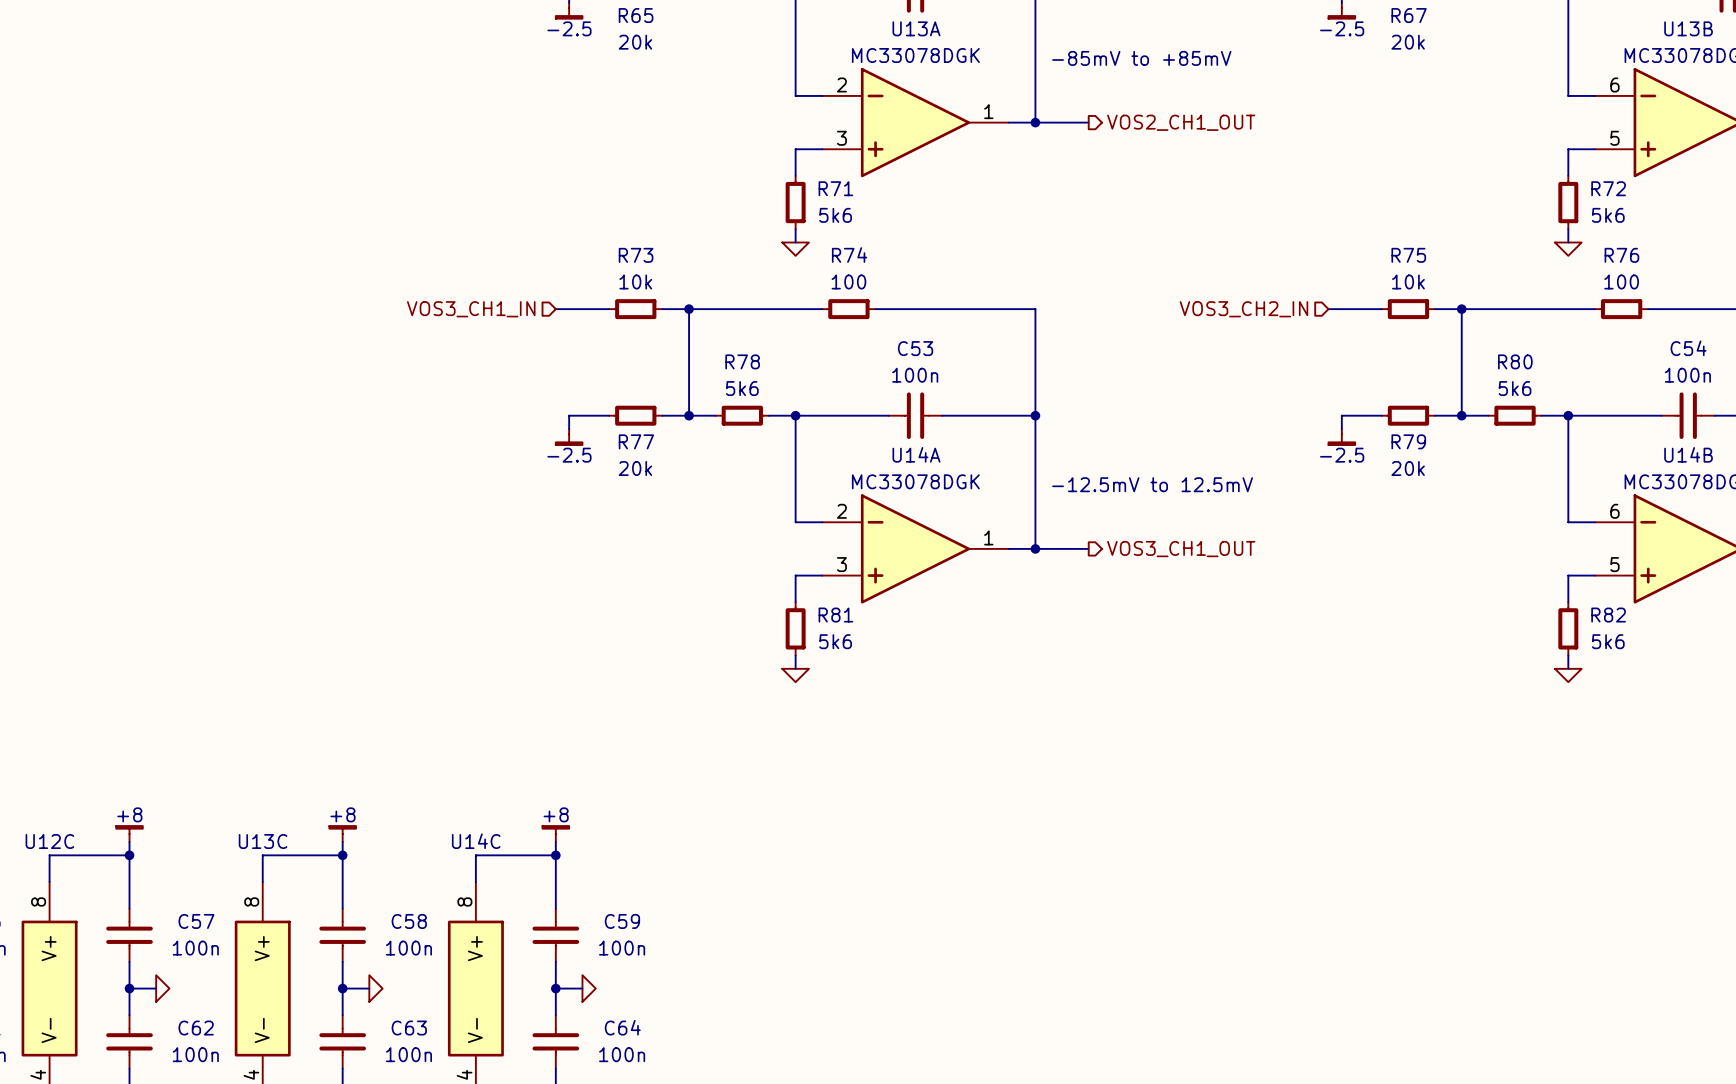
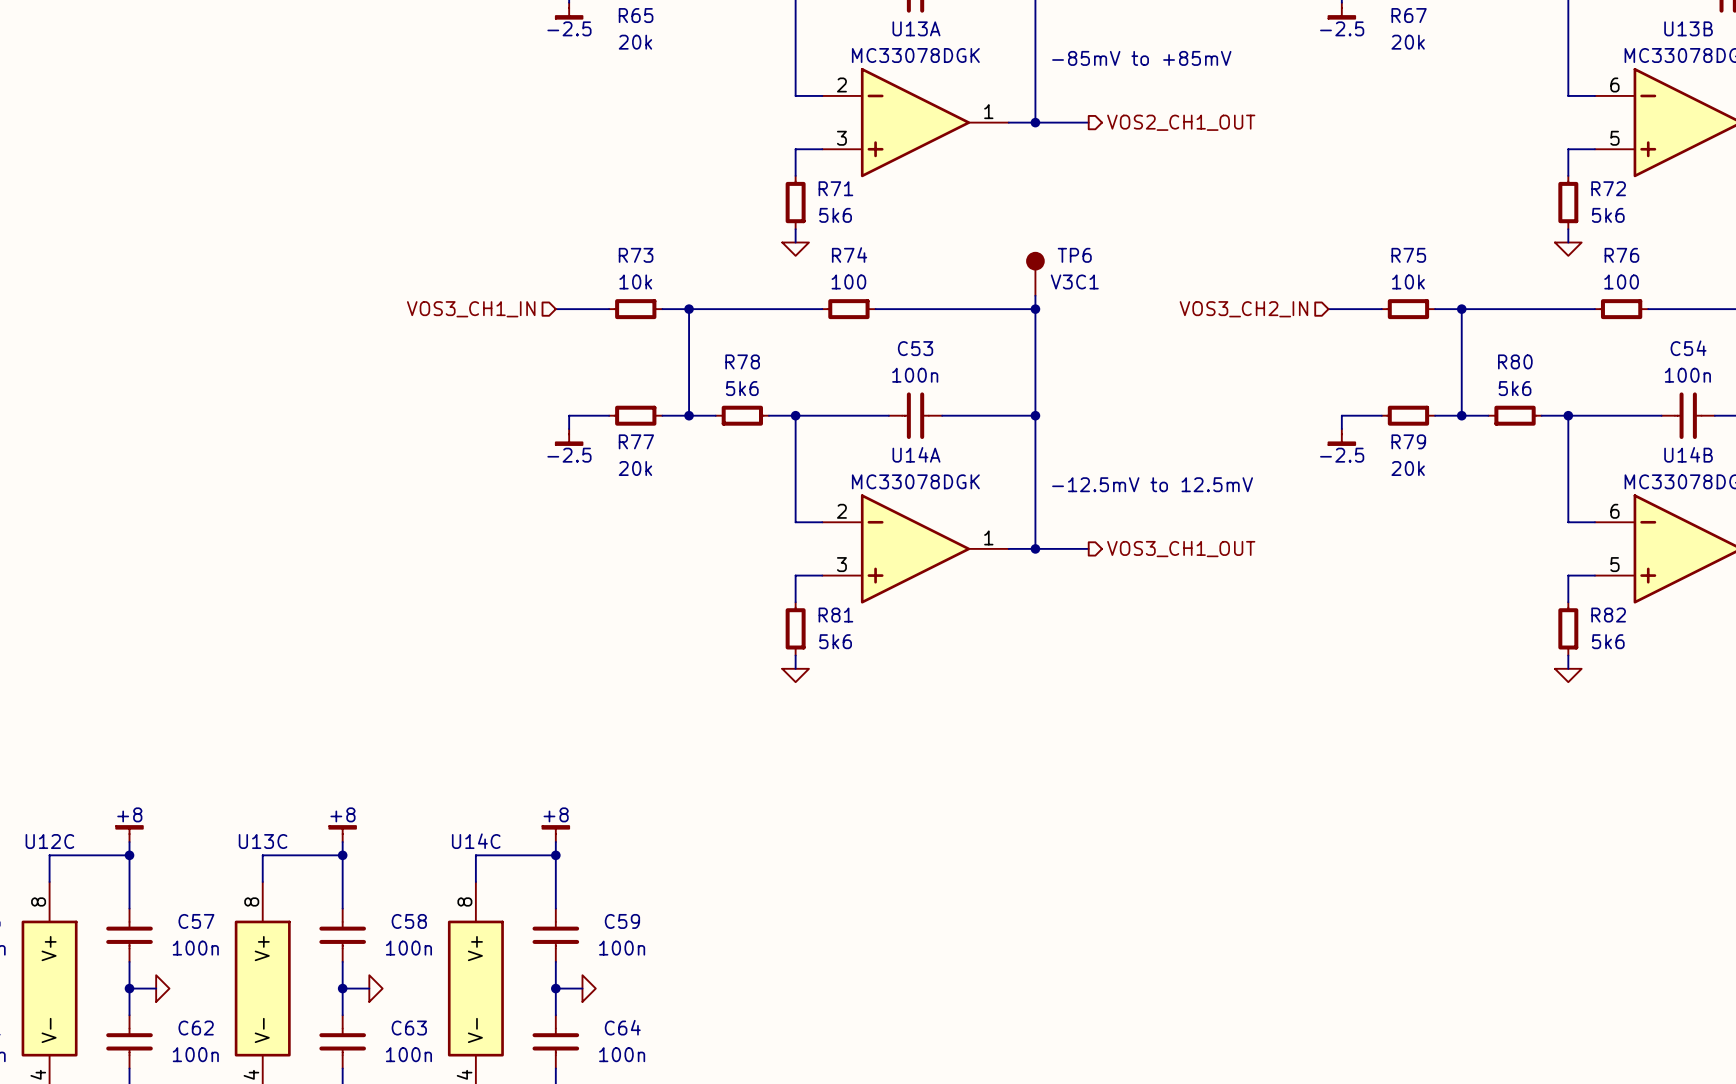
TP6: none -> V3C1 (1035, 273)
wire: none -> (1035, 295) (1035, 309)
junction: none -> (1035, 309)

